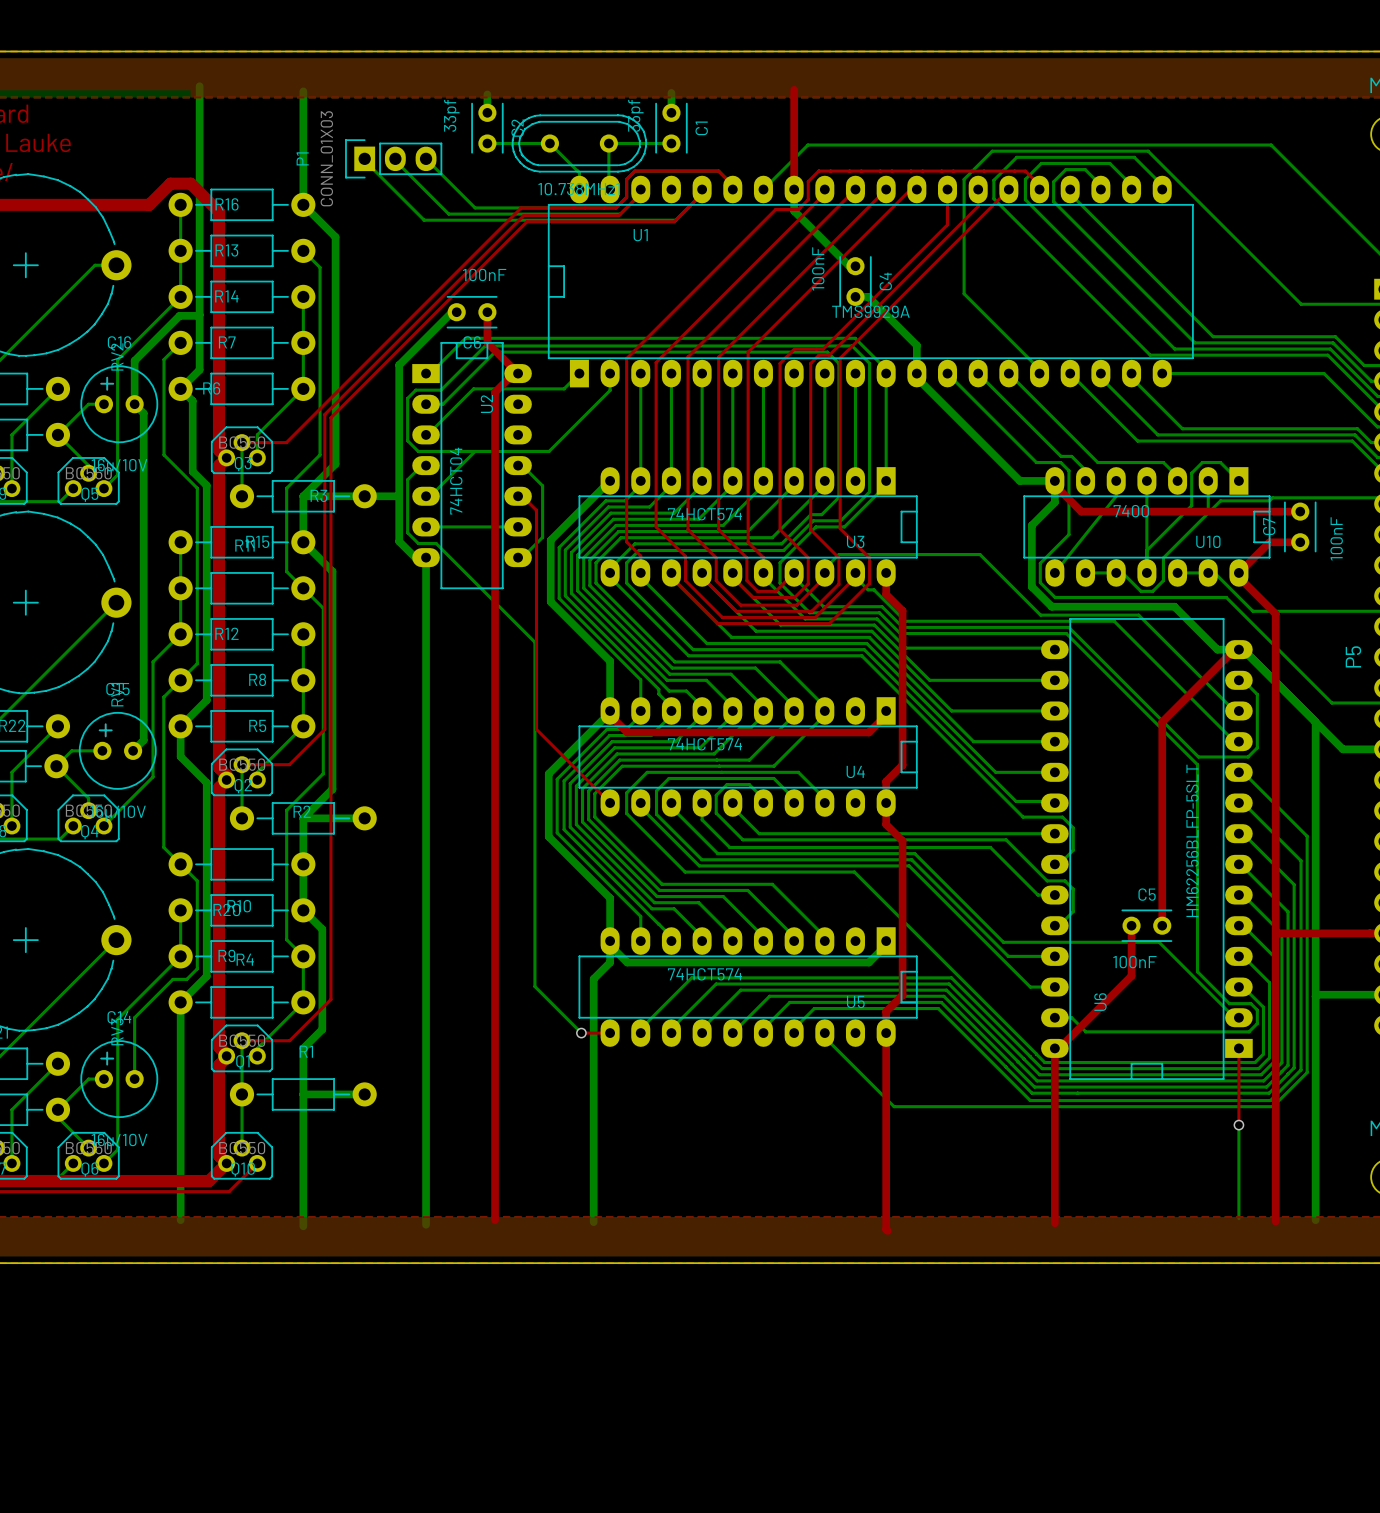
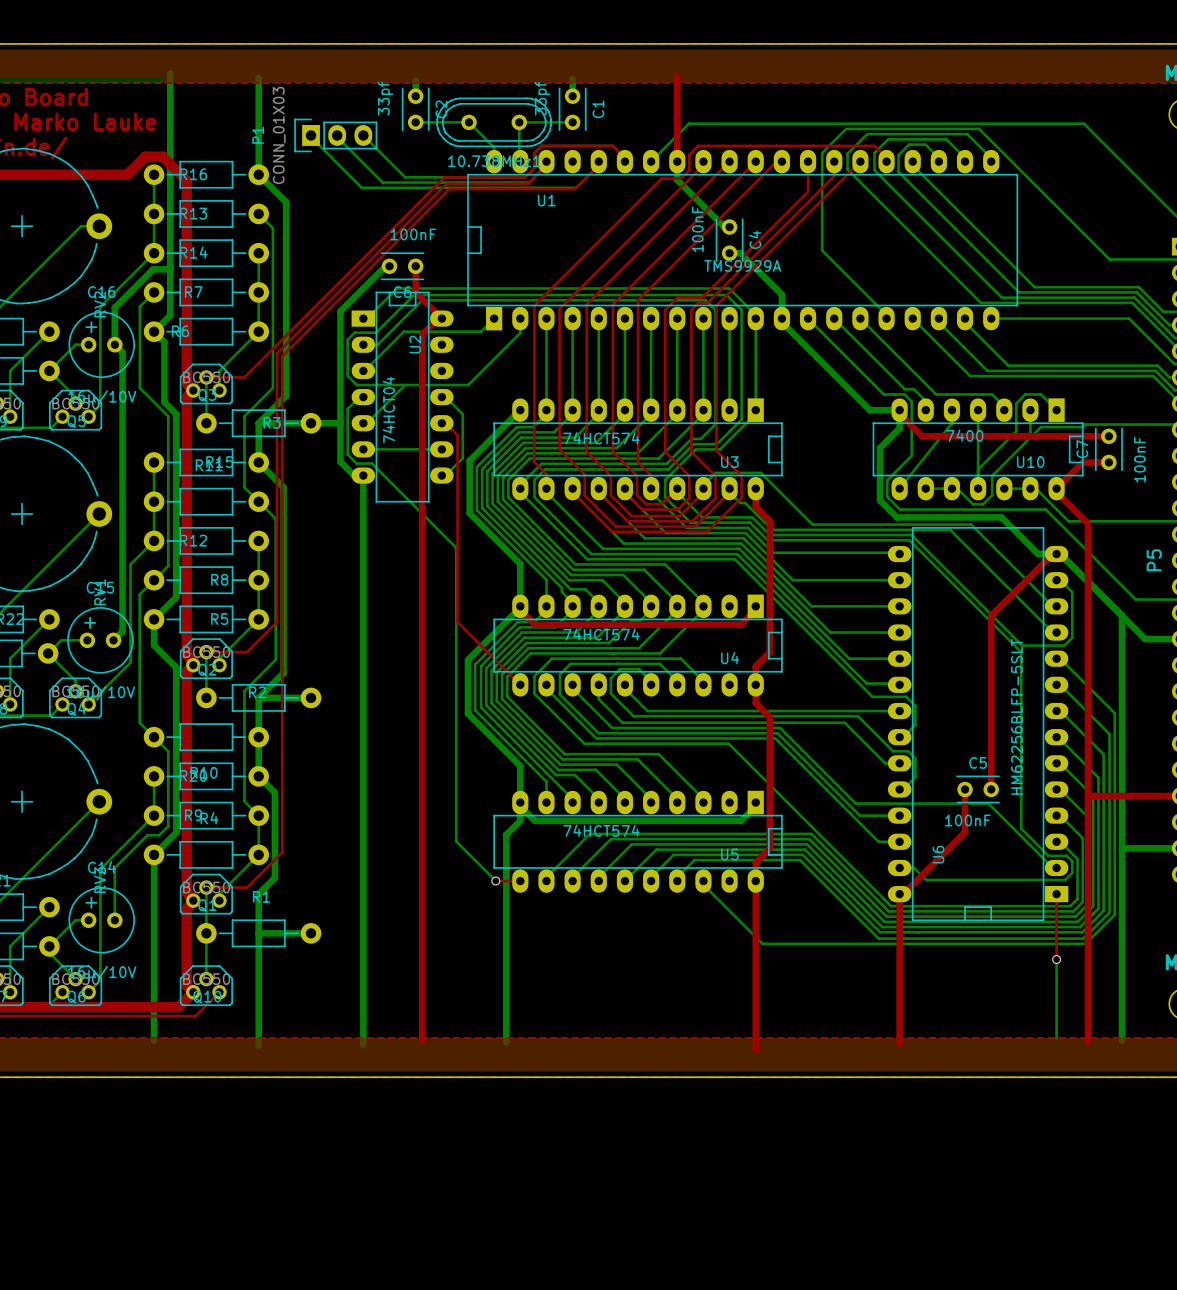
bottom track: (892, 554) (980, 554) (1040, 615) -> (760, 472) (812, 524) (887, 524)

